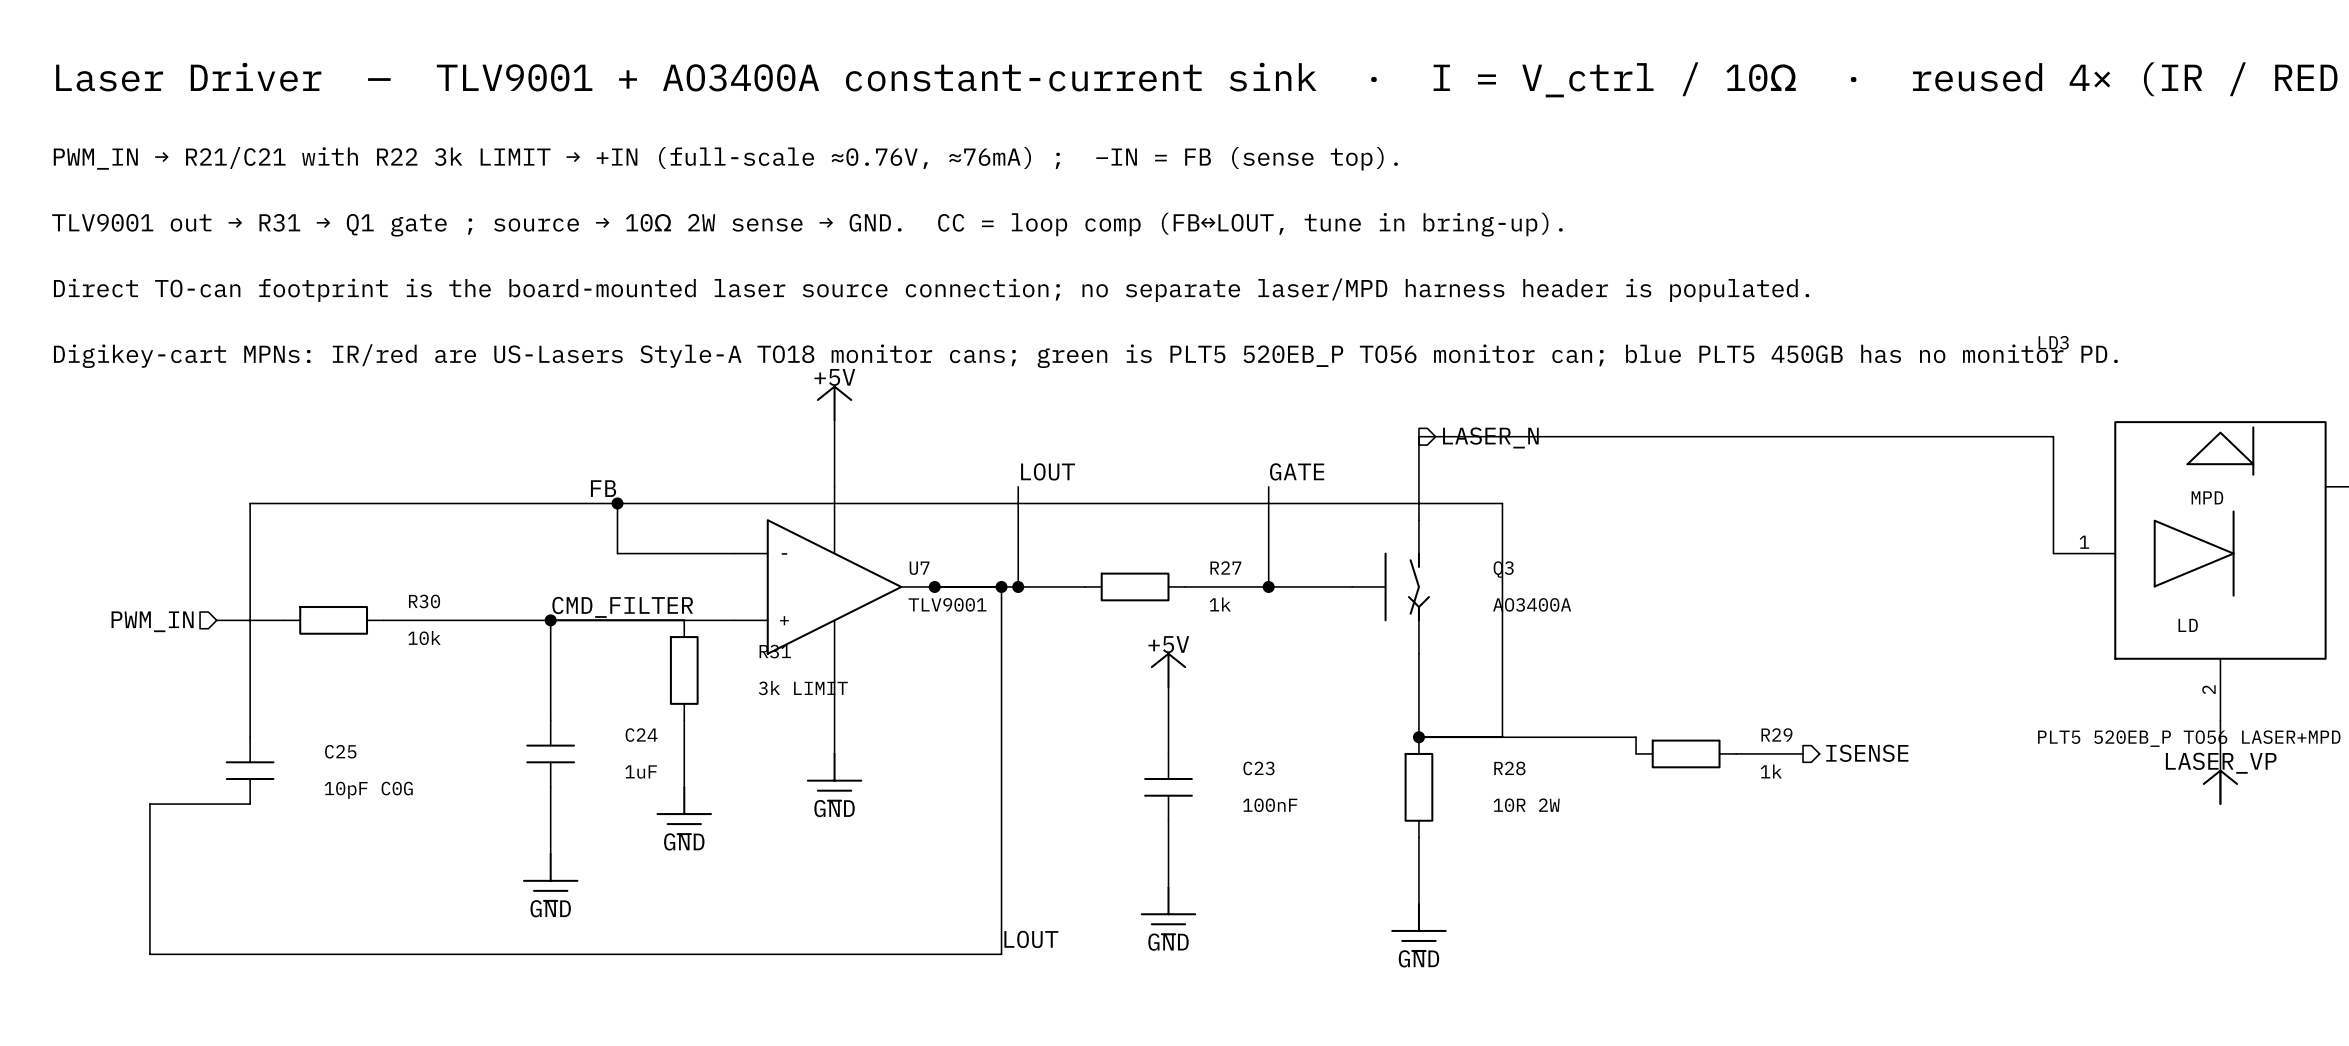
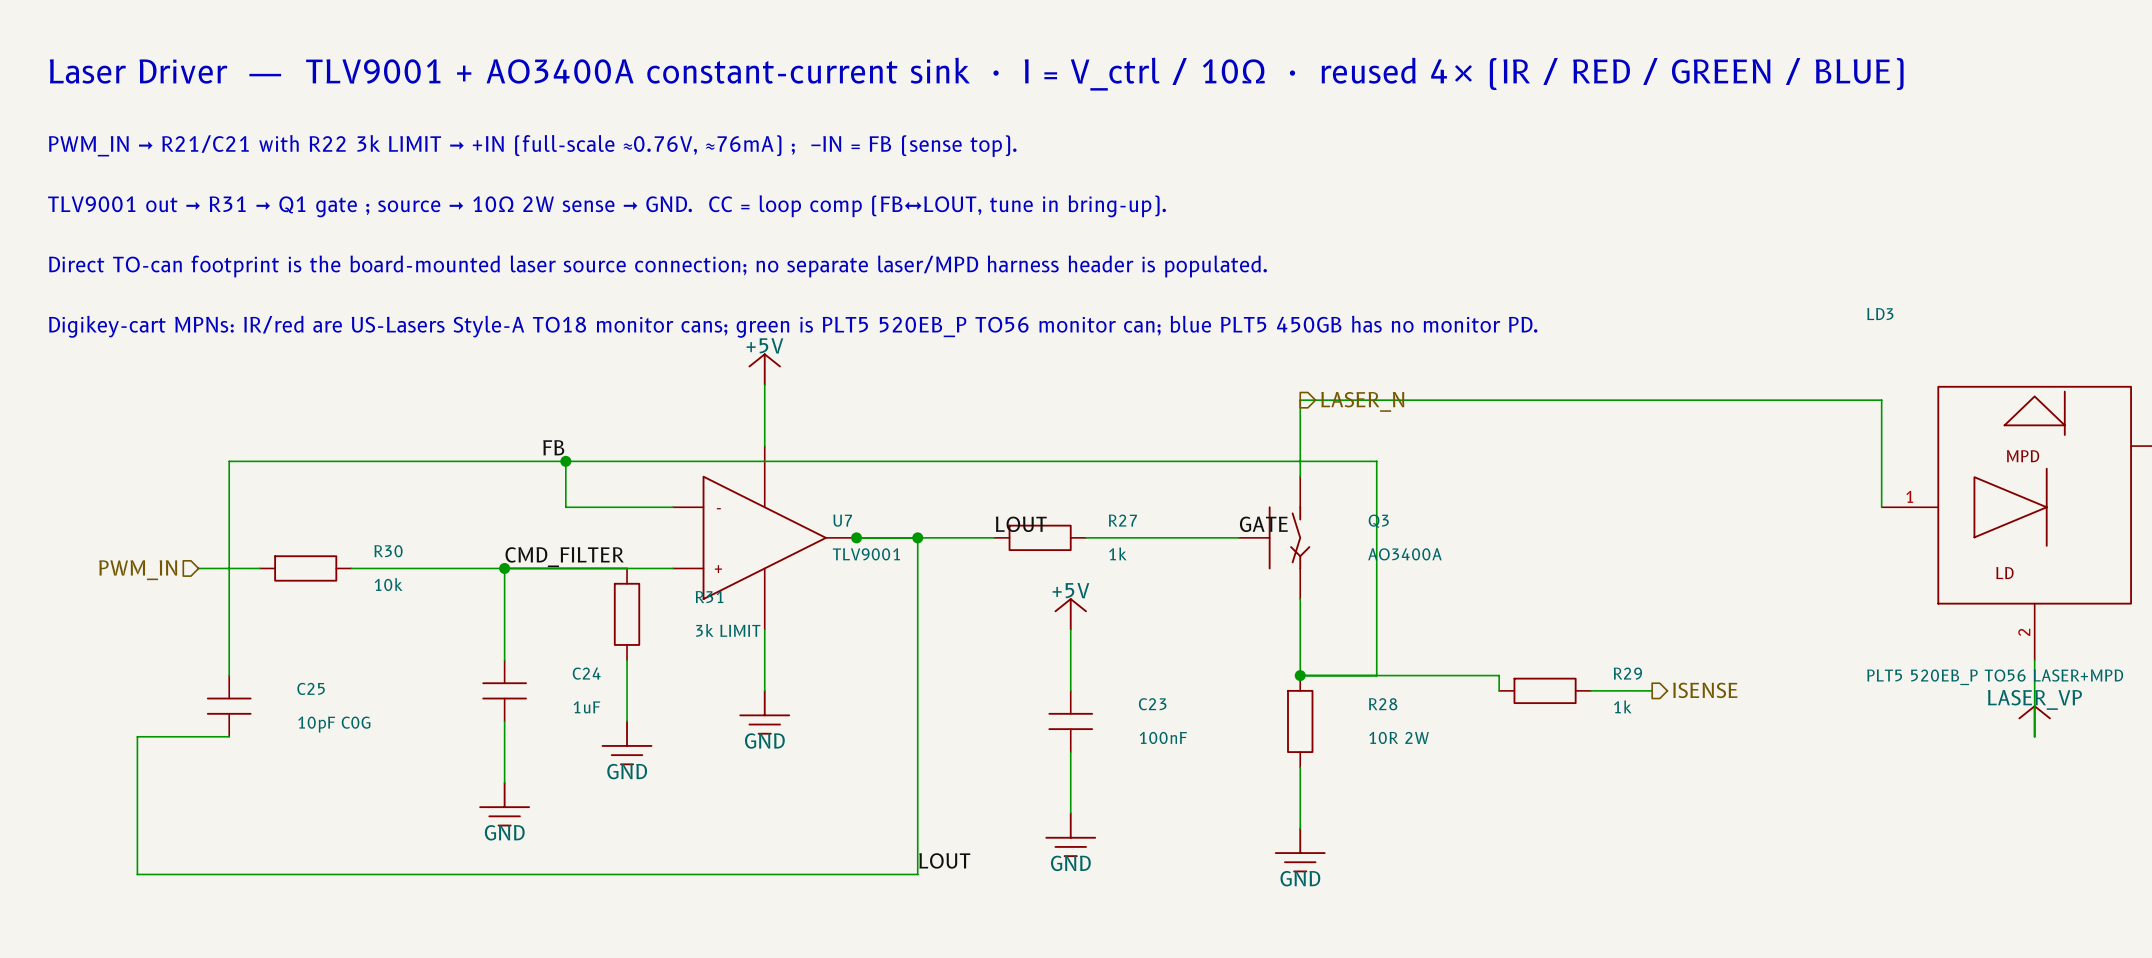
label position: LOUT (1048, 471) -> LOUT (1021, 524)
label position: GATE (1297, 471) -> GATE (1263, 524)
wire: (1018, 486) (1018, 586) -> none
wire: (1268, 486) (1268, 586) -> none
junction: (1018, 586) -> none
junction: (1268, 586) -> none

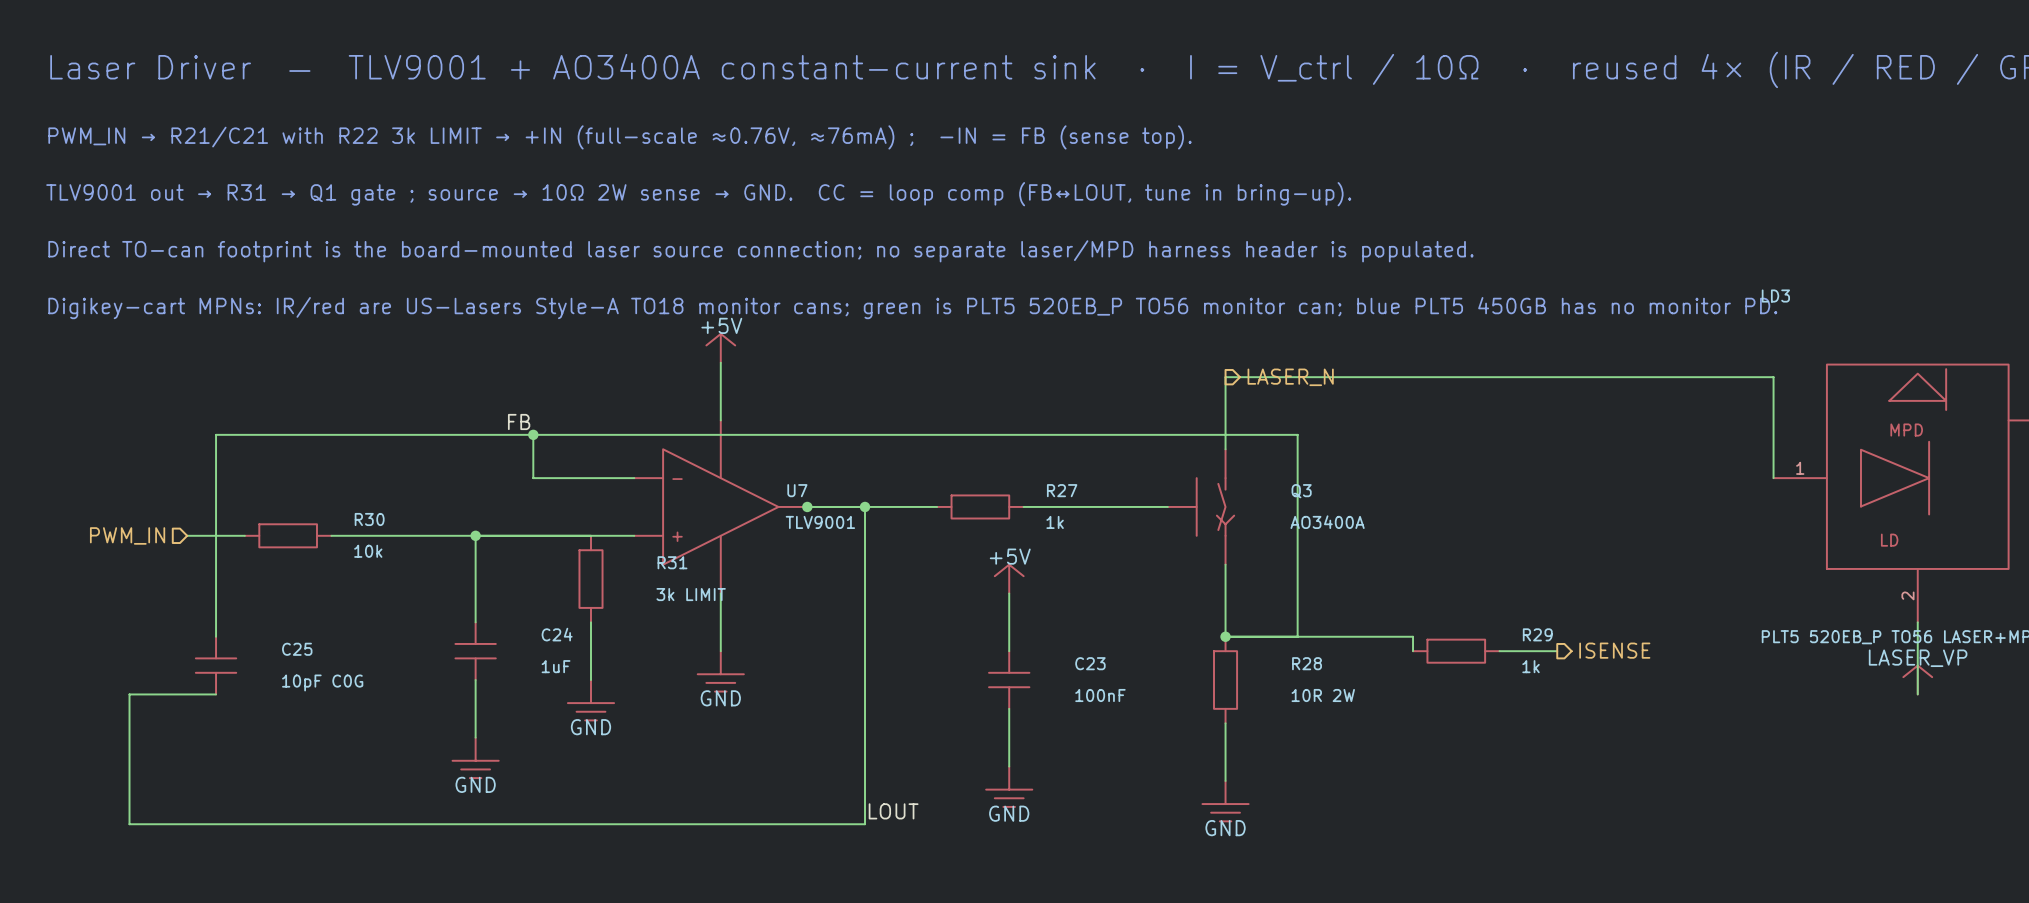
label: LOUT (1021, 524) -> none
label: GATE (1263, 524) -> none
label: CMD_FILTER (564, 557) -> none

